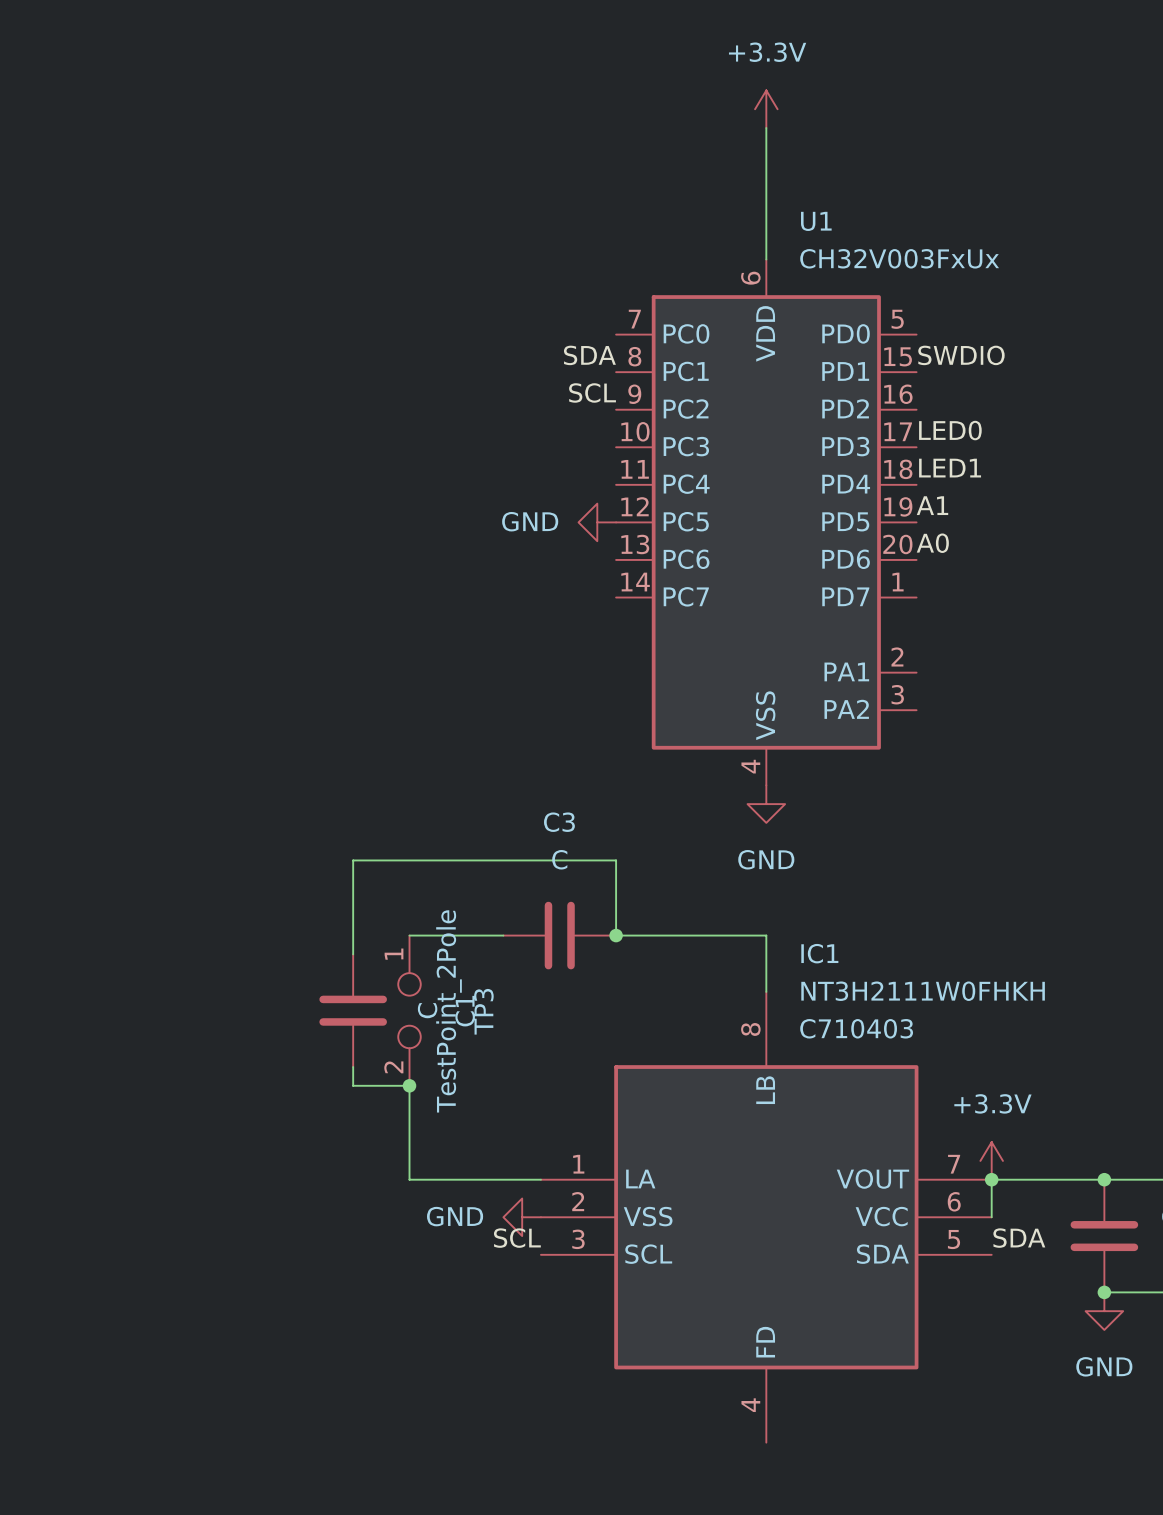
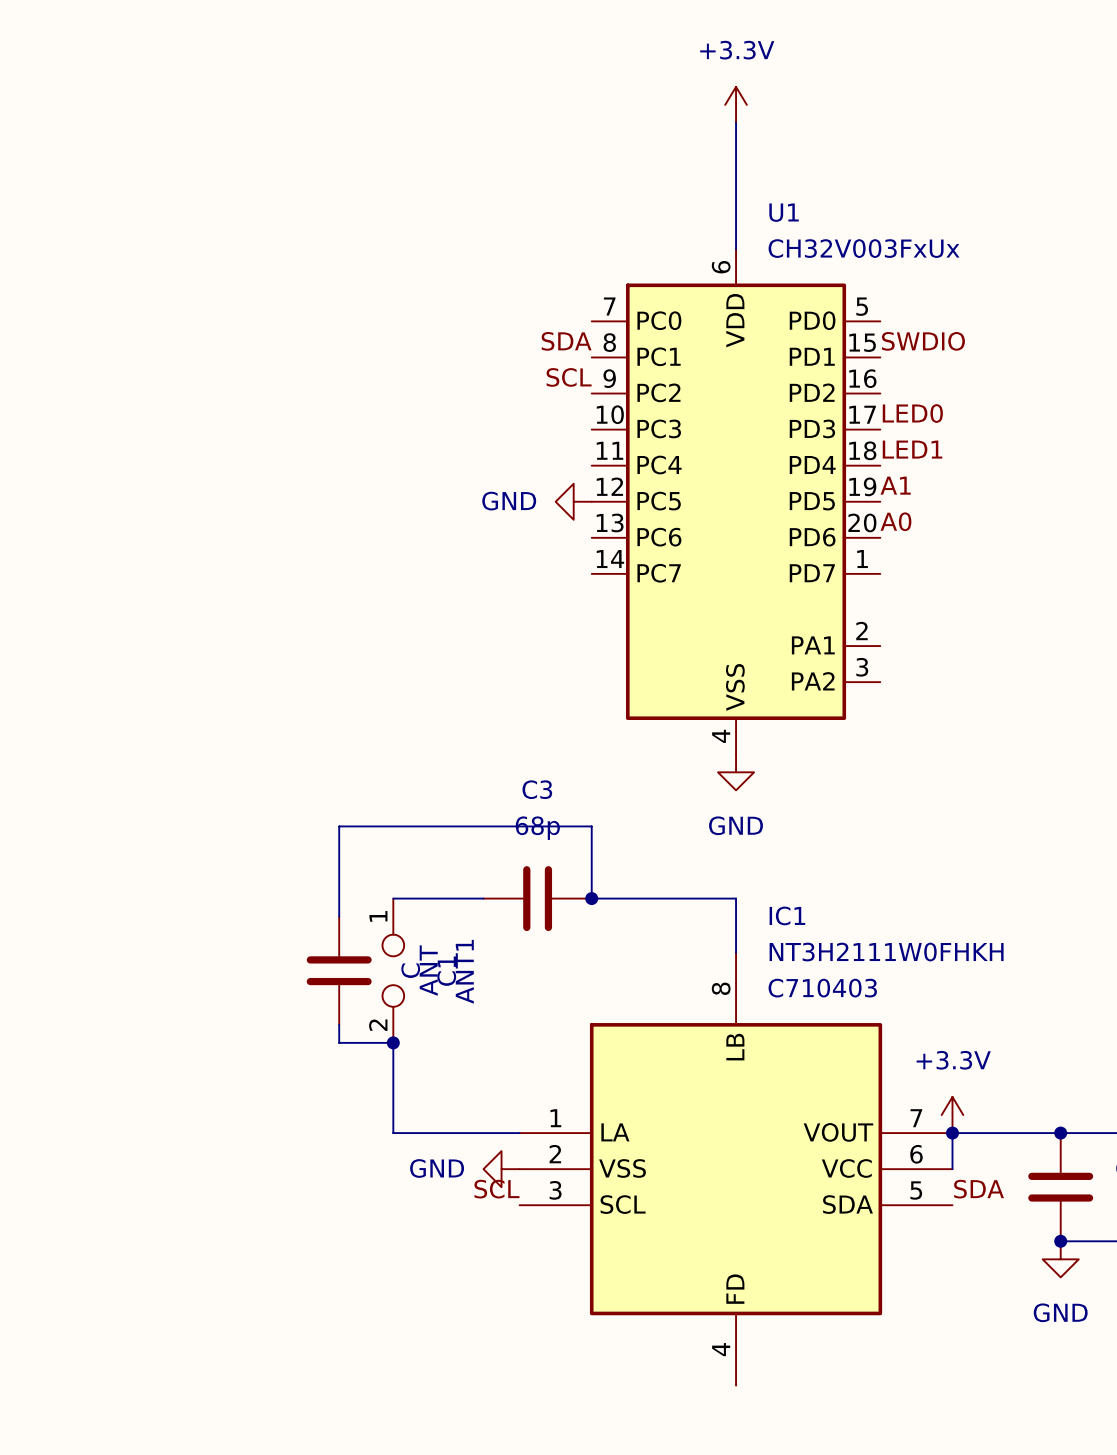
C3 value: C (559, 859) -> 68p (537, 828)
TP3 value: TestPoint_2Pole (449, 1011) -> ANT (428, 970)
TP3 name: TP3 (483, 1011) -> ANT1 (464, 971)

